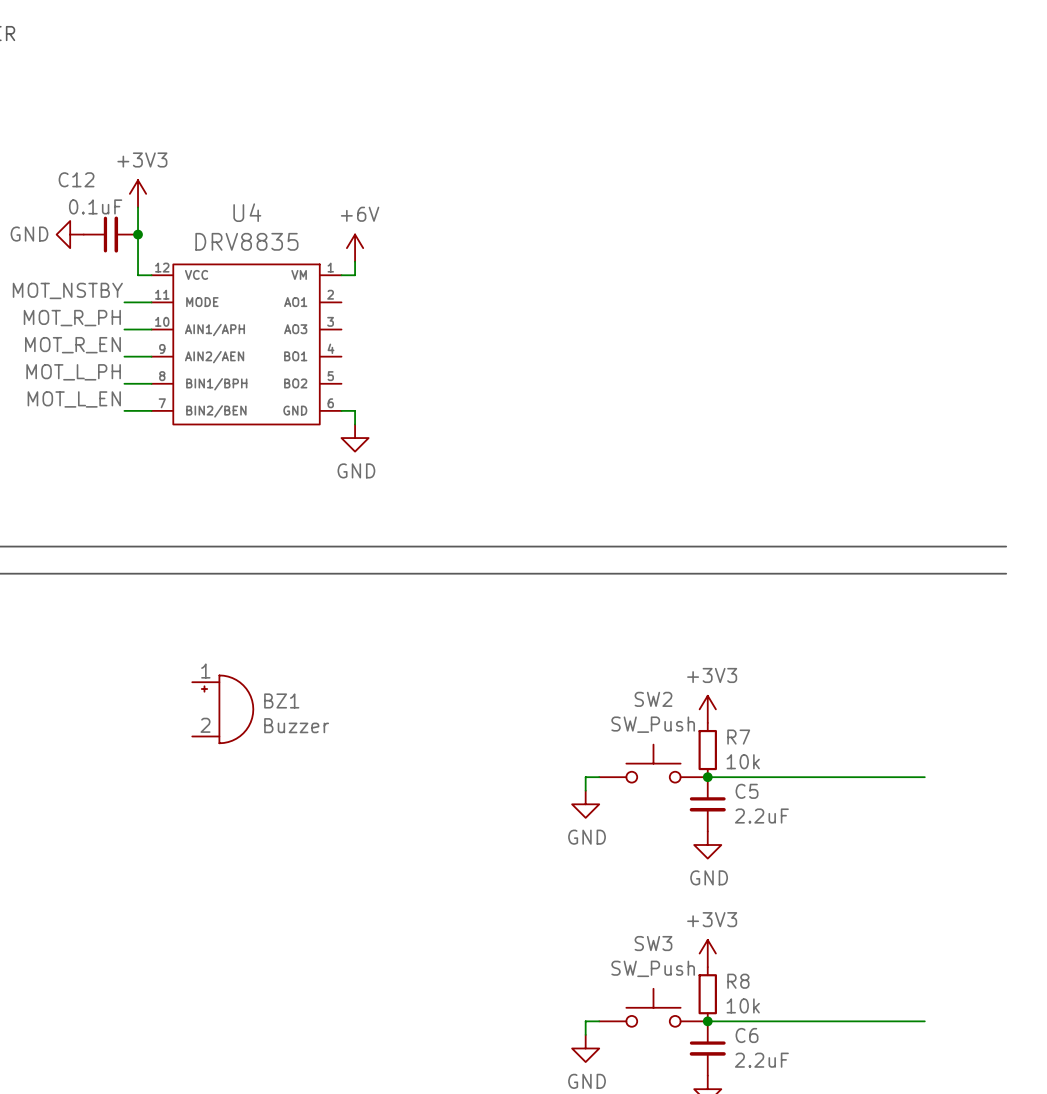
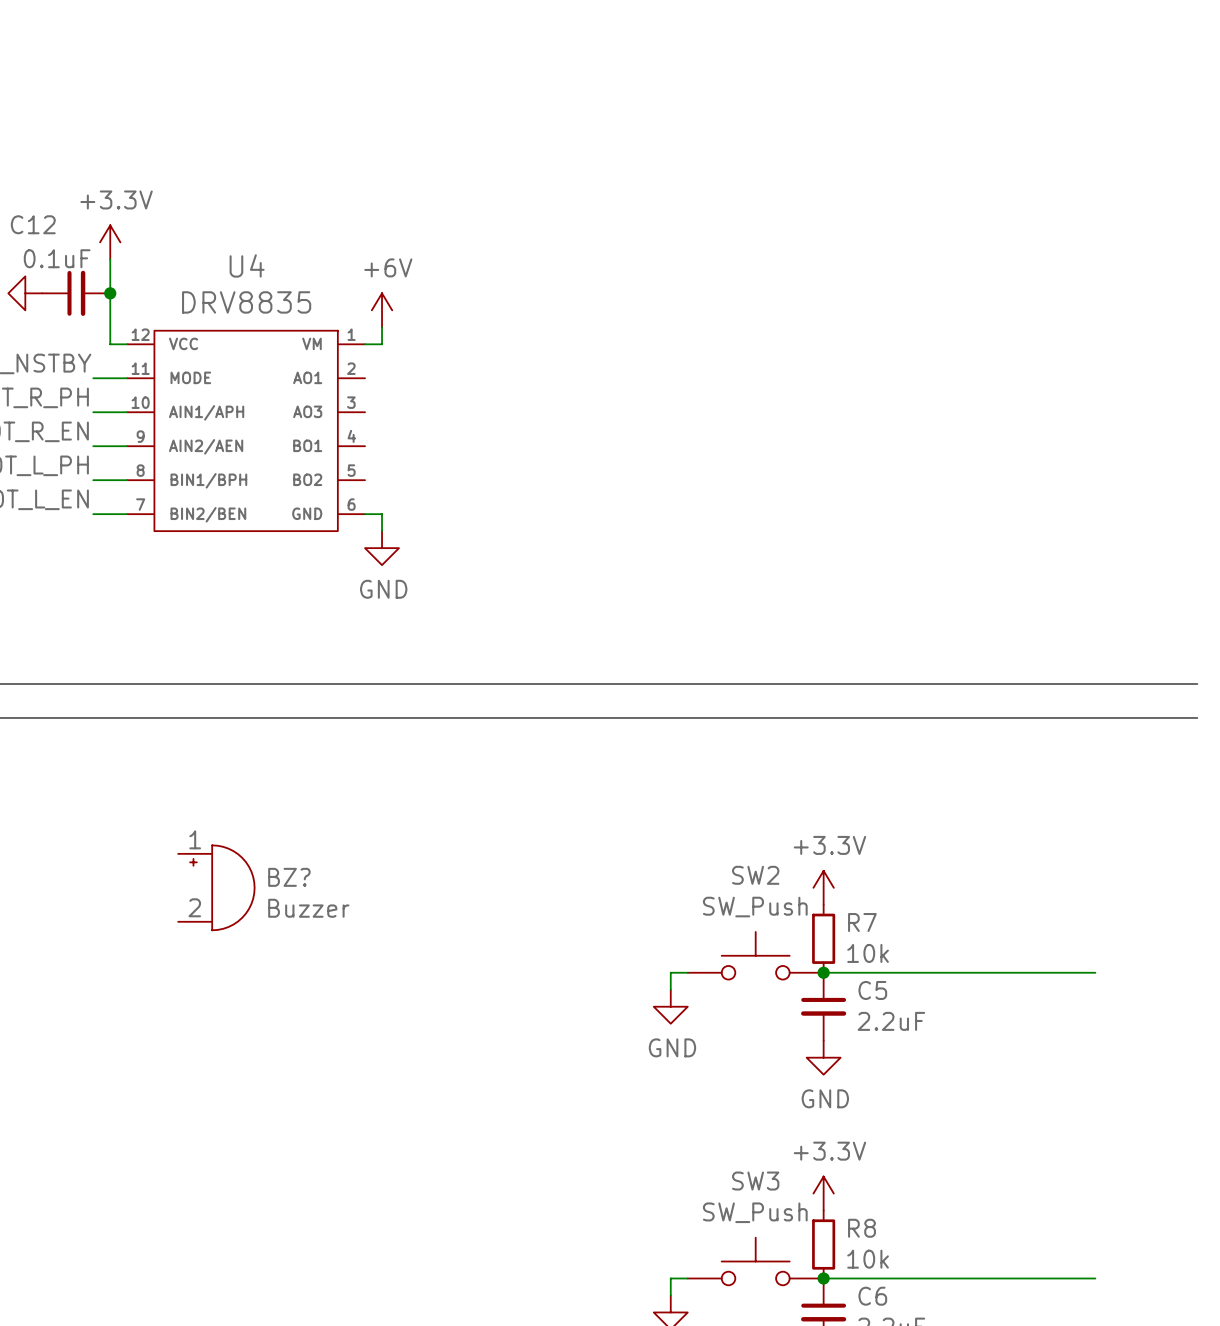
power symbol: +3V3 (138, 193) -> +3.3V (110, 242)
BZ1 name: BZ1 (281, 700) -> BZ? (289, 877)
power symbol: +3V3 (707, 709) -> +3.3V (823, 887)
power symbol: +3V3 (707, 953) -> +3.3V (823, 1193)

